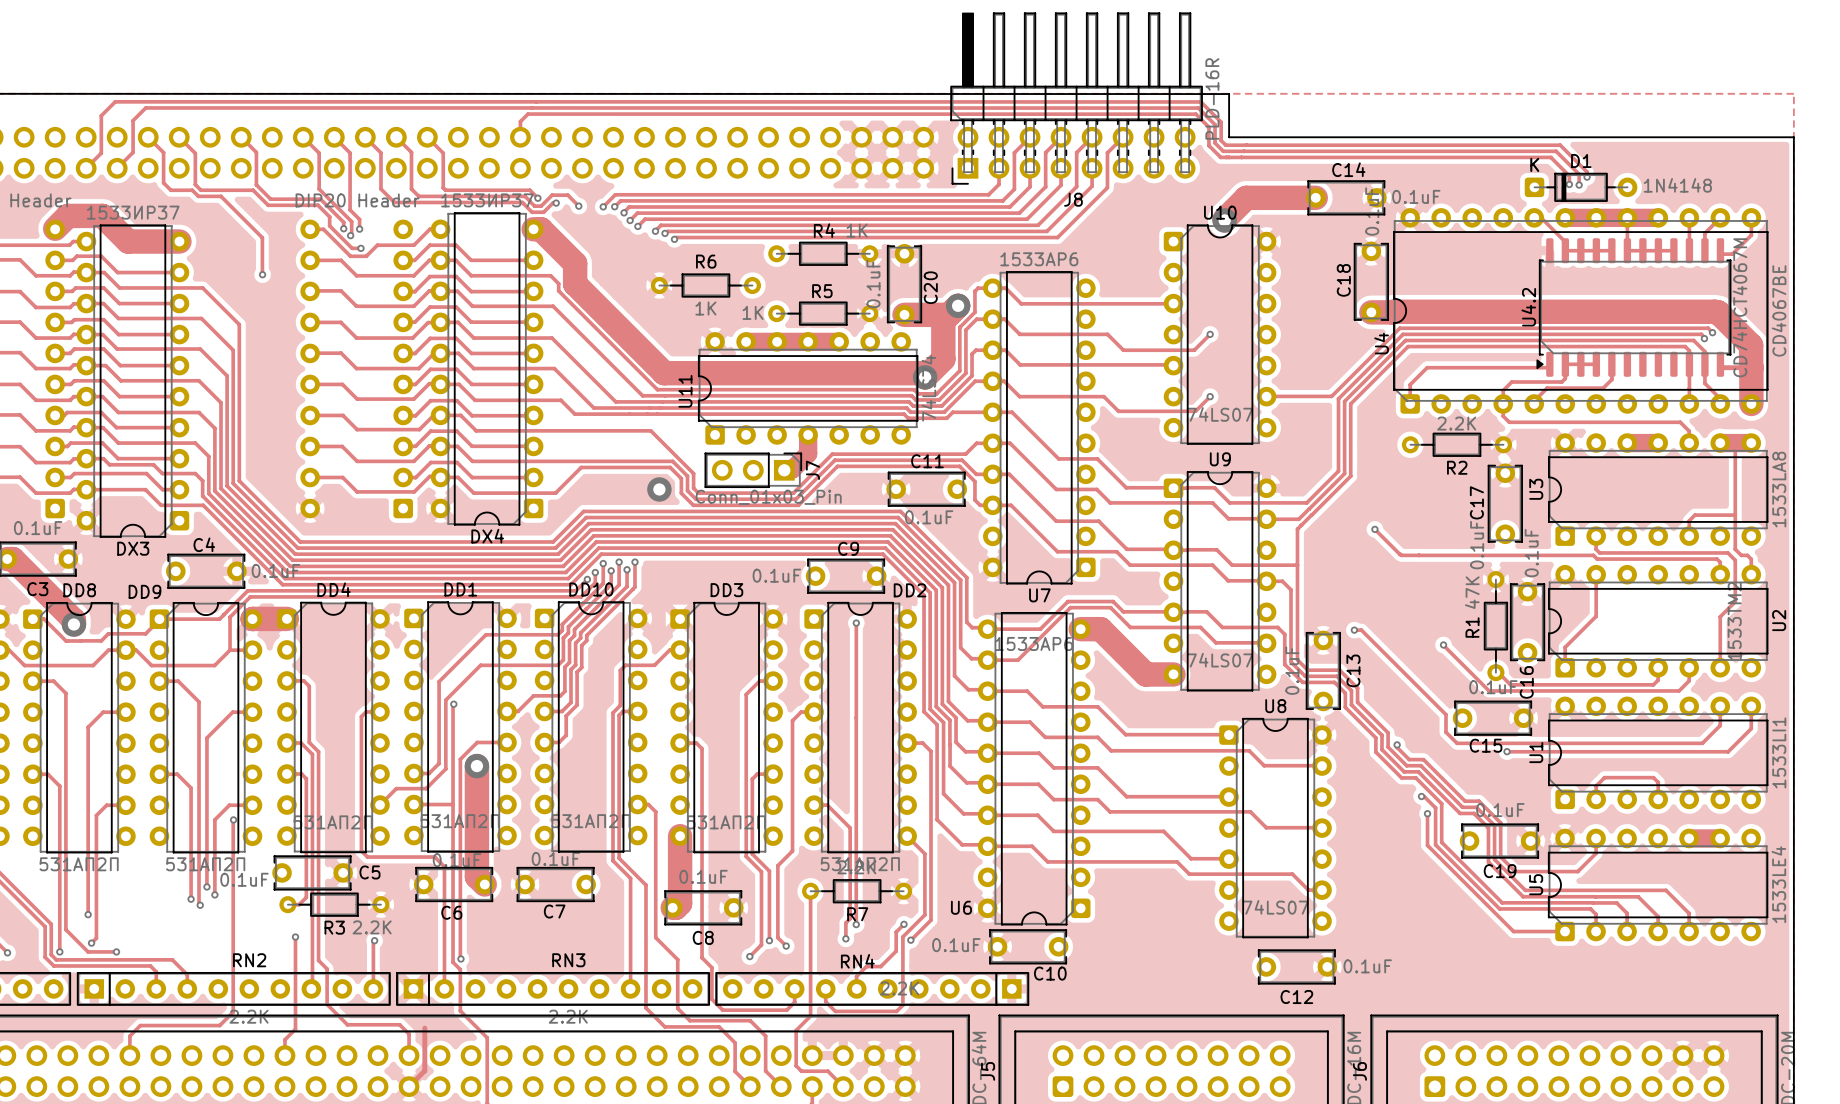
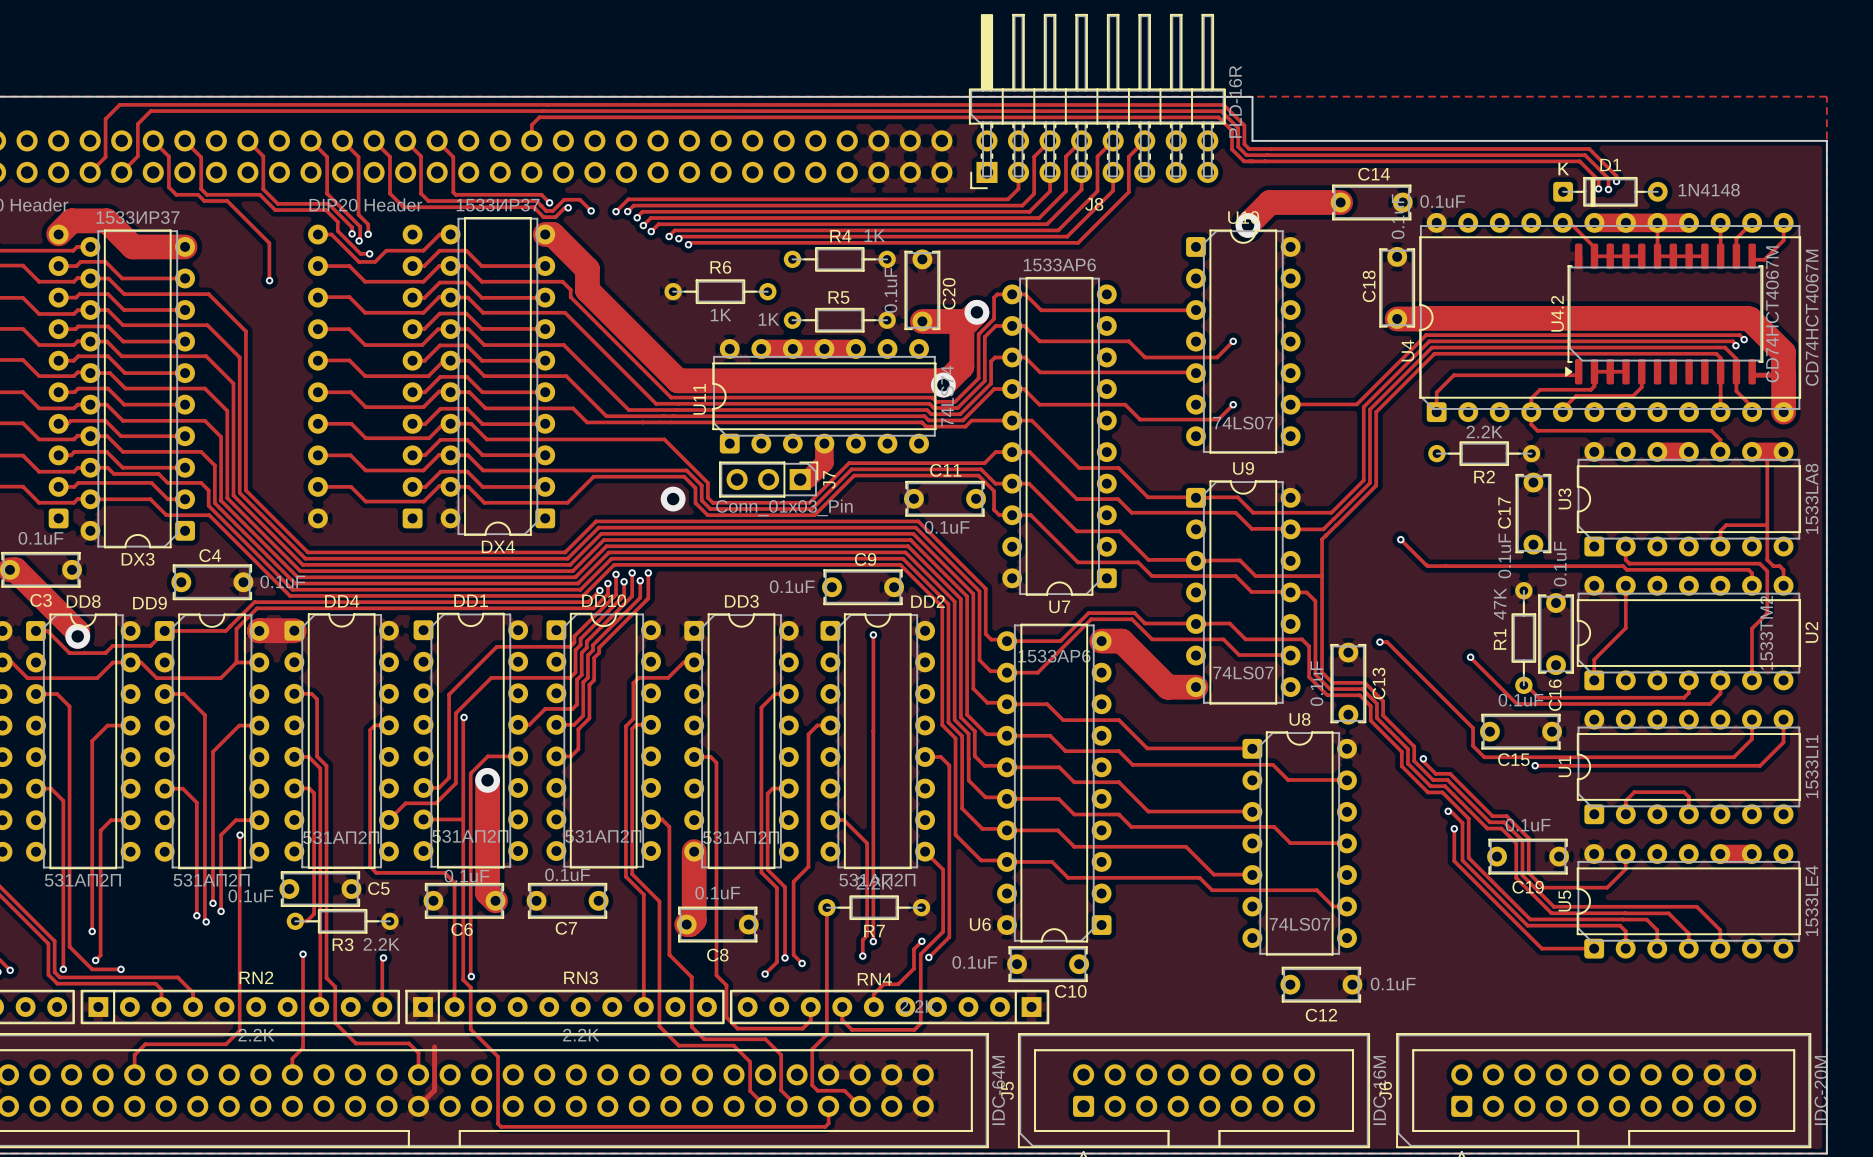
U4 value: CD4067BE (1779, 310) -> CD74HCT4067M (1812, 317)

